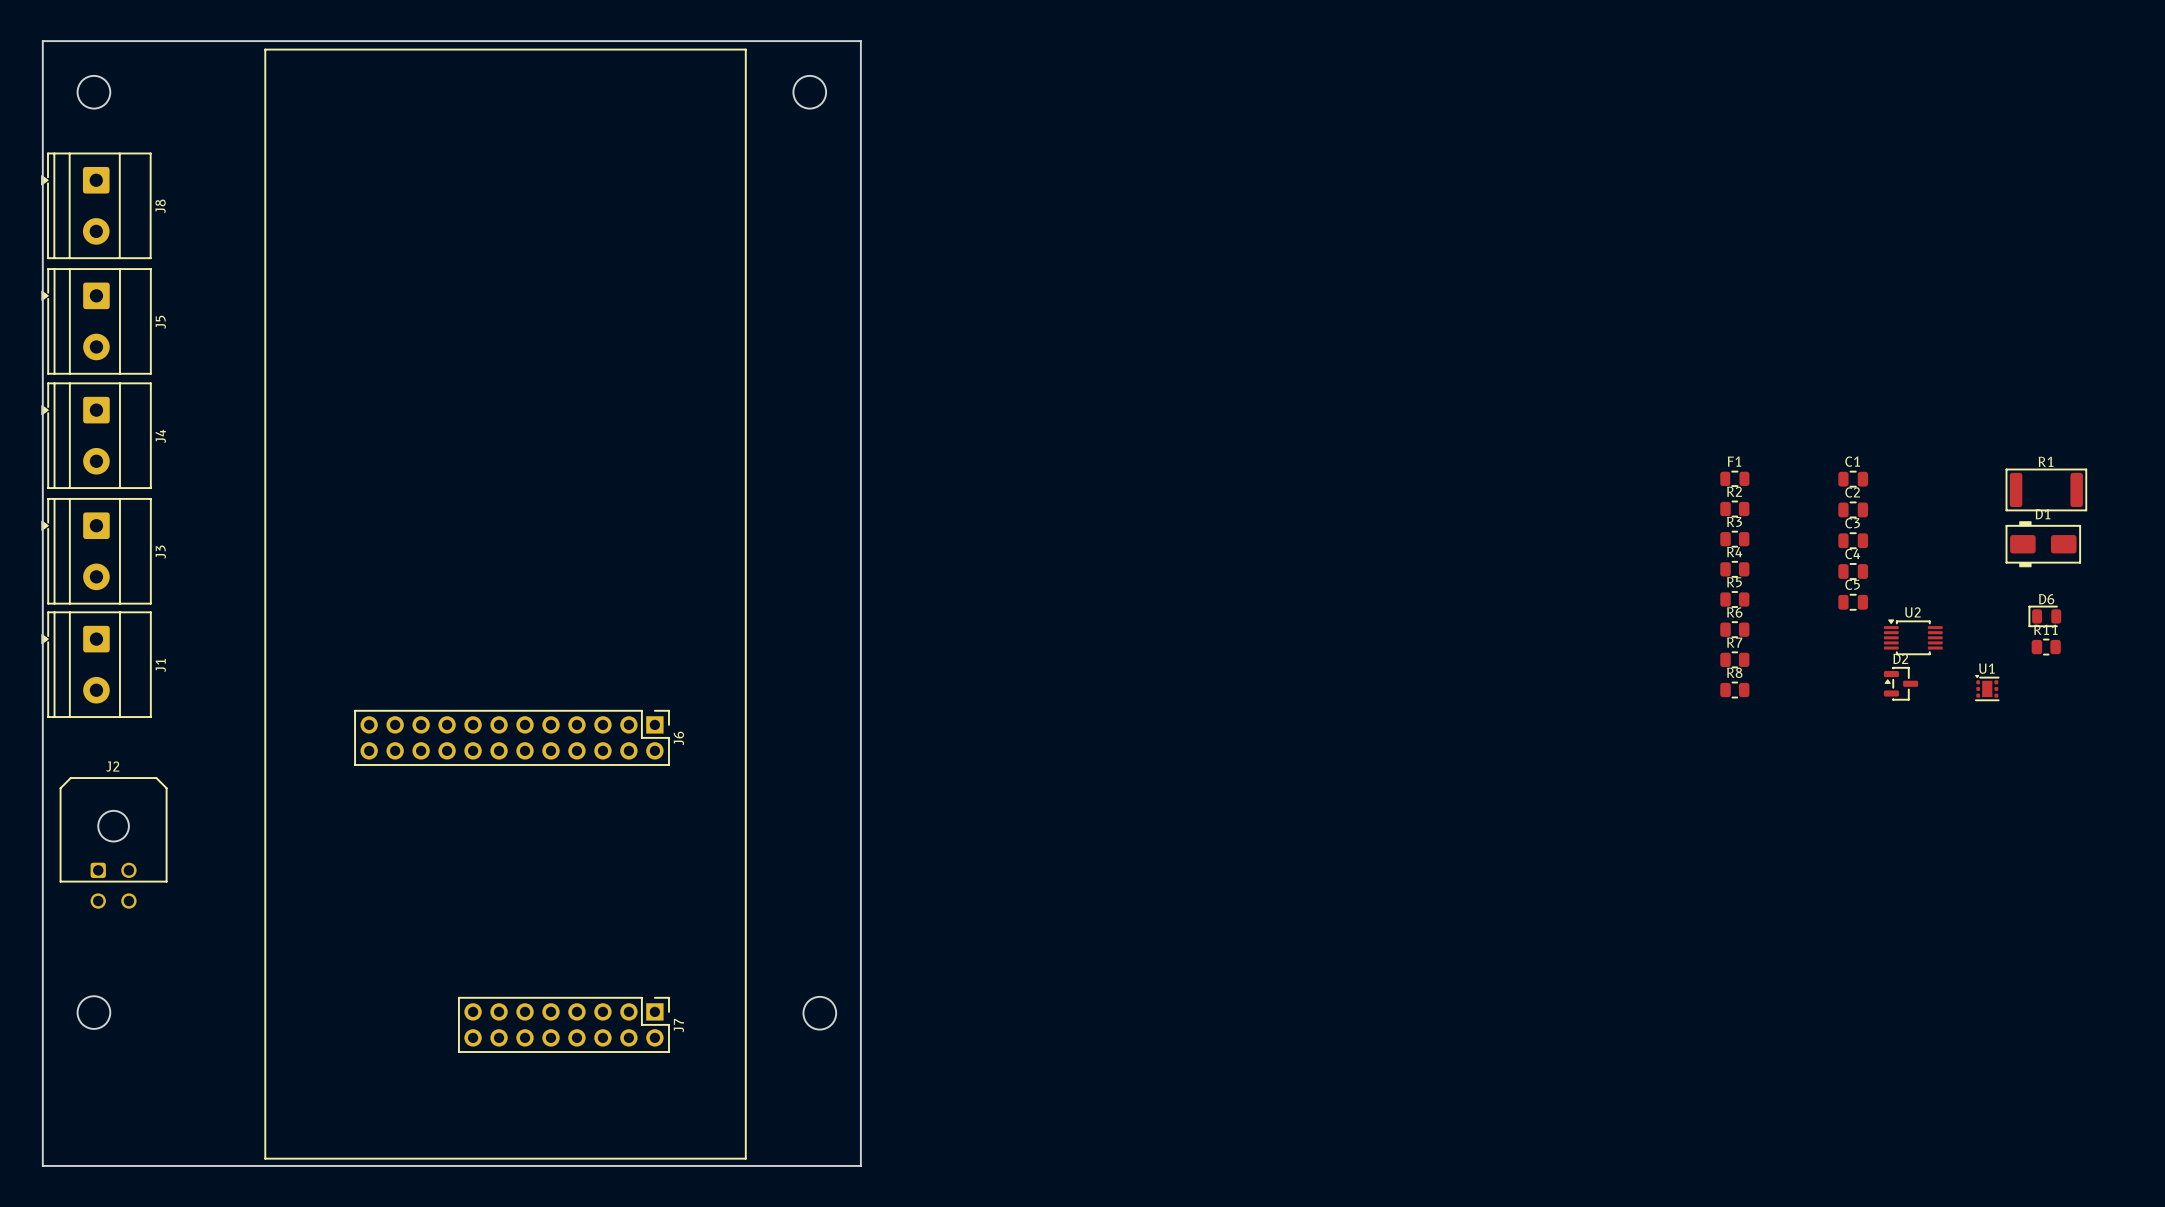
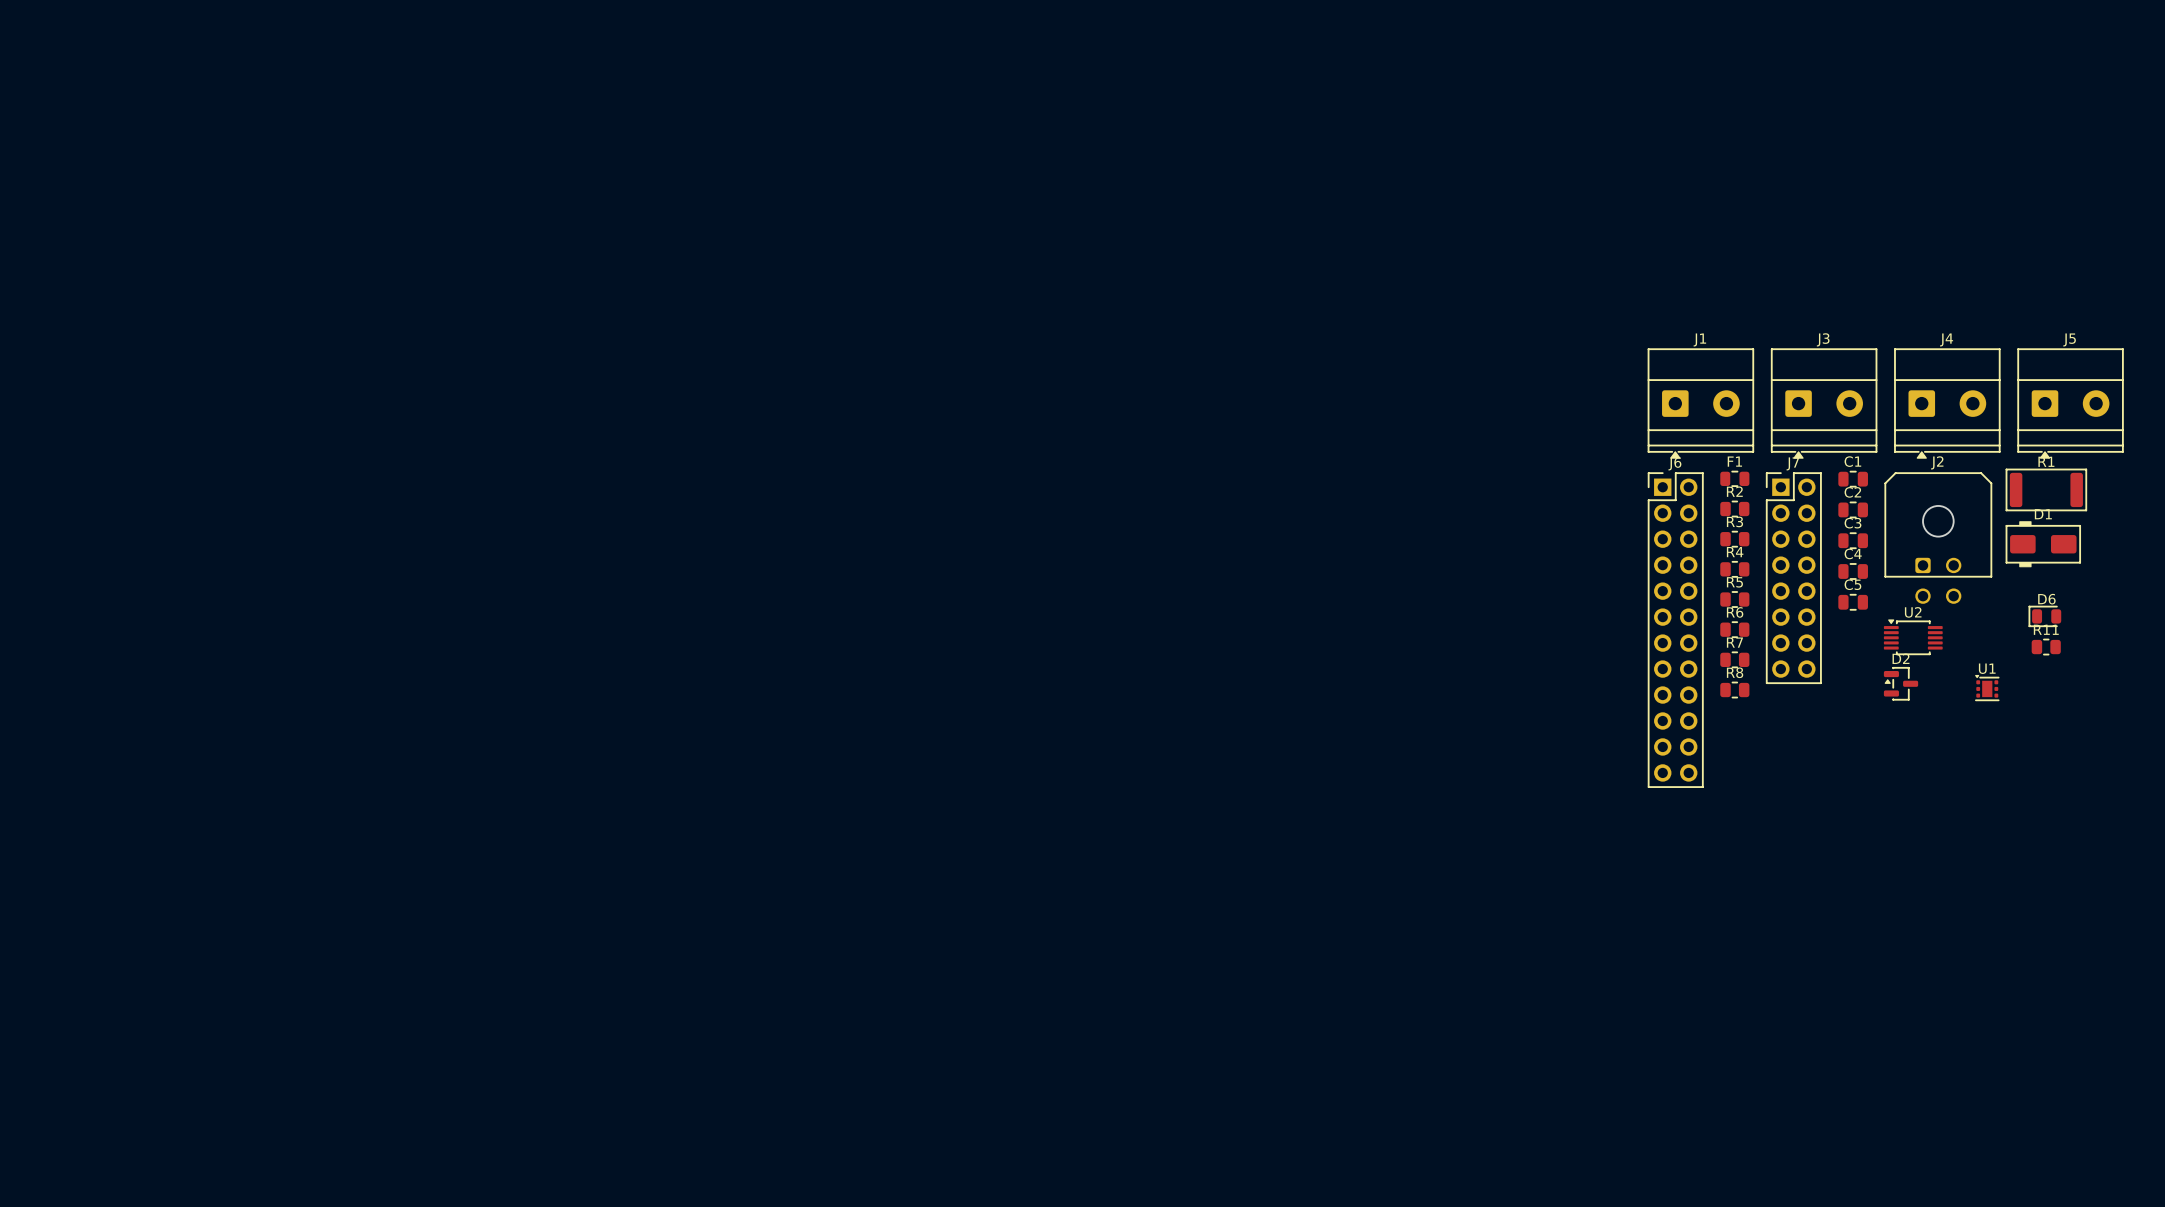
board edge: (42, 41) (860, 41) (860, 1165) (42, 1165) (42, 41) -> none
line: (265, 49) (745, 49) (745, 1158) (265, 1158) (265, 49) -> none
round board edge: [77, 75, 111, 109] -> none
round board edge: [793, 75, 827, 109] -> none
J8: (96, 205) -> none
J5 rotation: 0° (96, 321) -> 90° counterclockwise (2070, 403)
J5 position: (96, 321) -> (2070, 403)
J4 rotation: 0° (96, 435) -> 90° counterclockwise (1947, 403)
J4 position: (96, 435) -> (1947, 403)
J3 rotation: 0° (96, 551) -> 90° counterclockwise (1824, 403)
J3 position: (96, 551) -> (1824, 403)
J1 rotation: 0° (96, 664) -> 90° counterclockwise (1700, 403)
J1 position: (96, 664) -> (1700, 403)
J6 rotation: 0° (512, 737) -> 90° counterclockwise (1675, 630)
J6 position: (512, 737) -> (1675, 630)
J2 position: (113, 843) -> (1938, 538)
round board edge: [77, 995, 111, 1030] -> none
round board edge: [803, 996, 837, 1030] -> none
J7 rotation: 0° (563, 1024) -> 90° counterclockwise (1793, 578)
J7 position: (563, 1024) -> (1793, 578)

